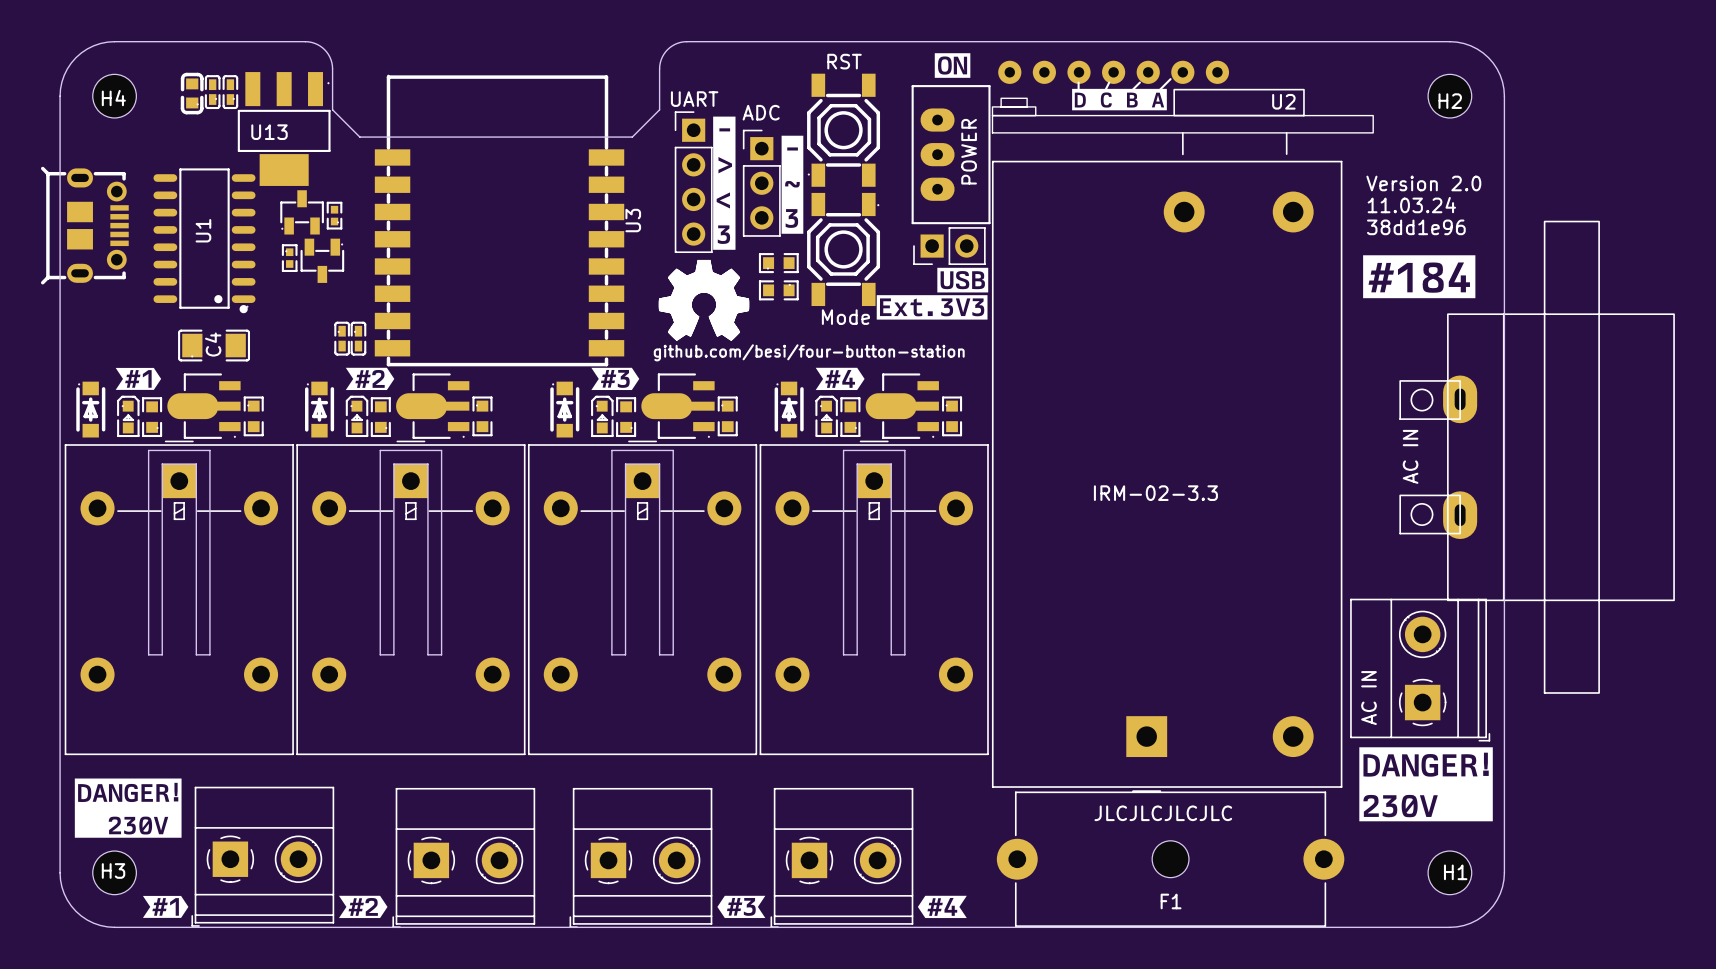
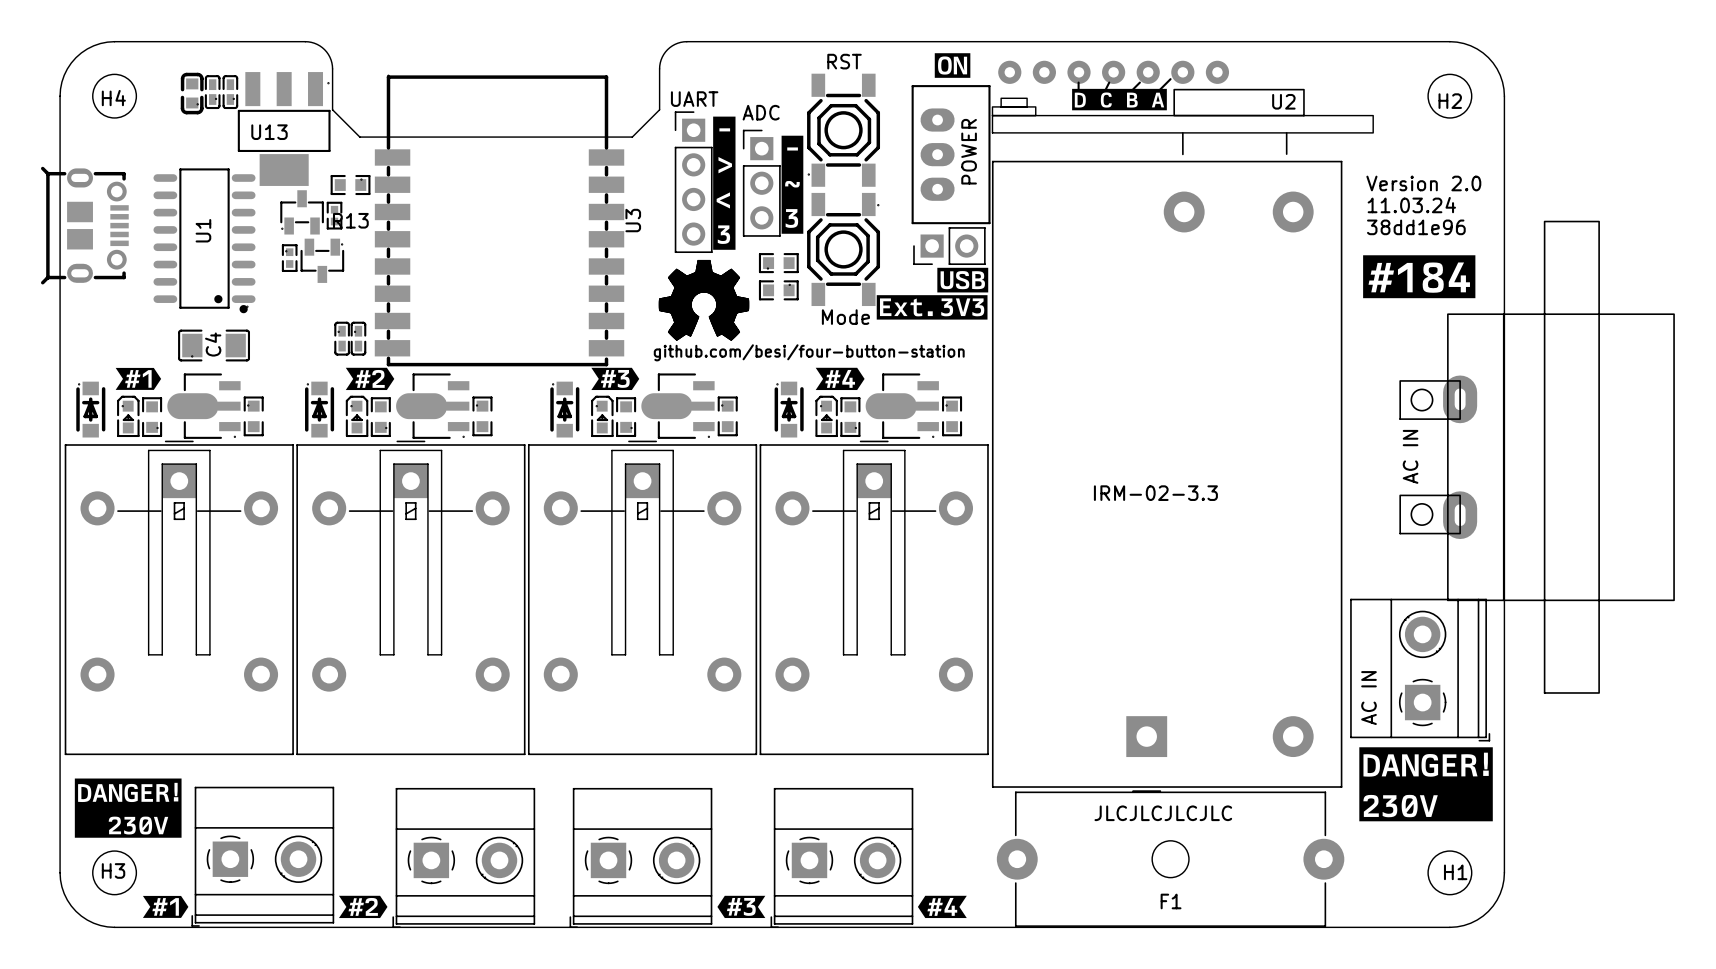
R13: none -> (350, 185)

